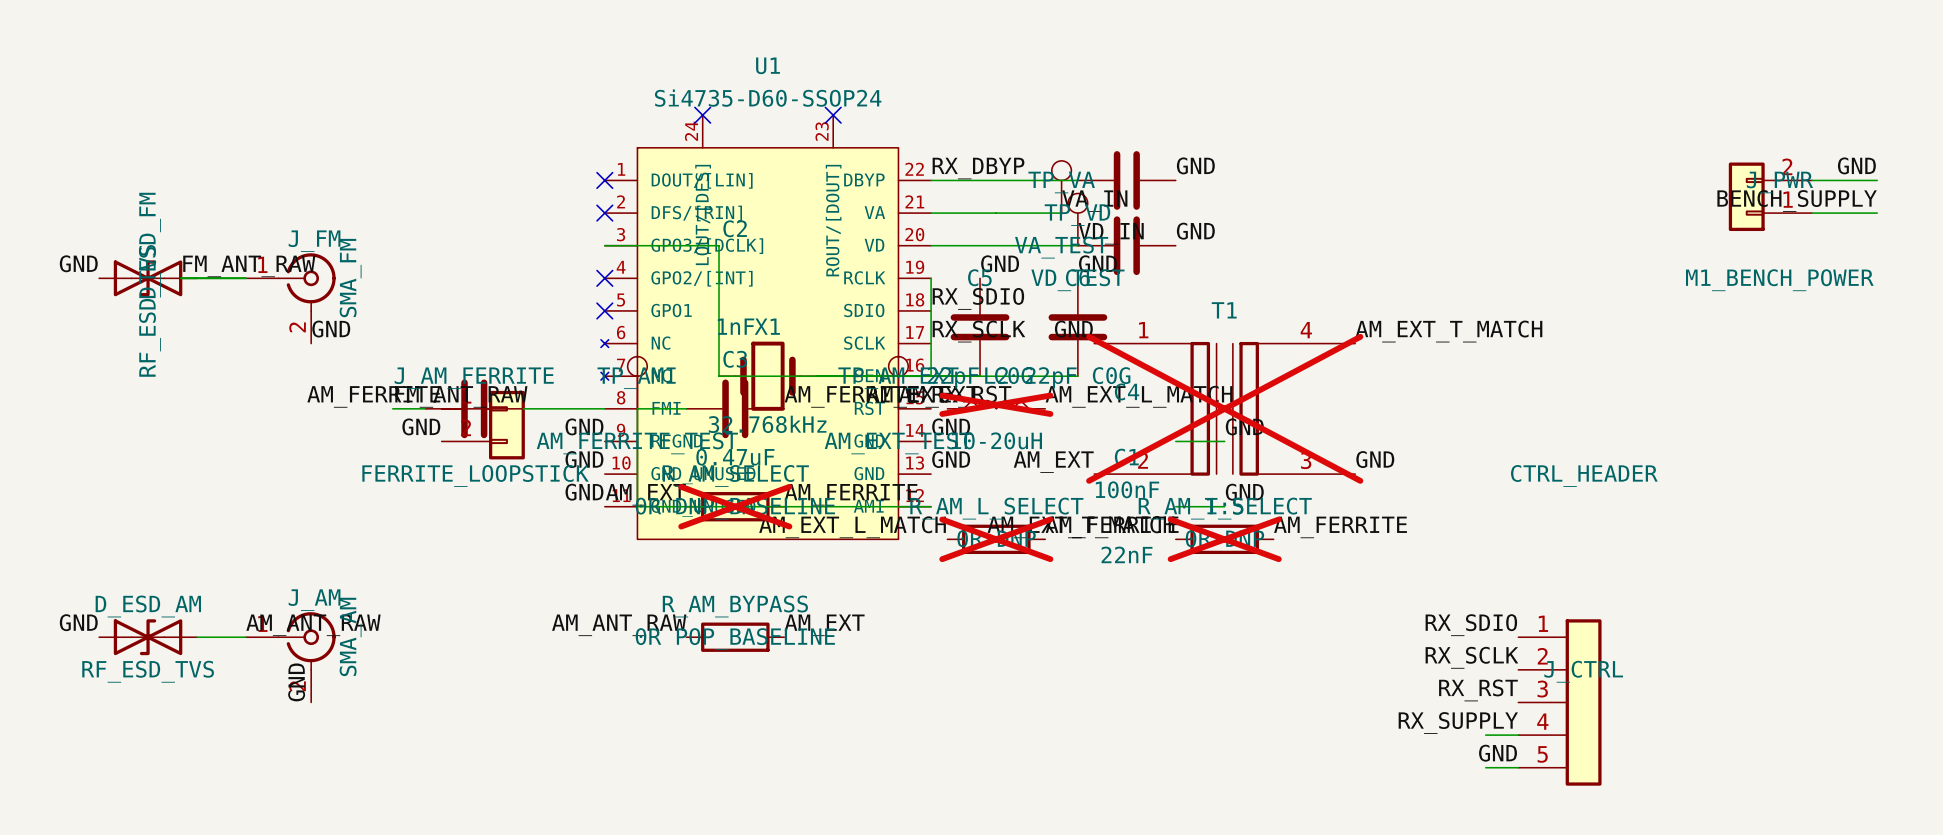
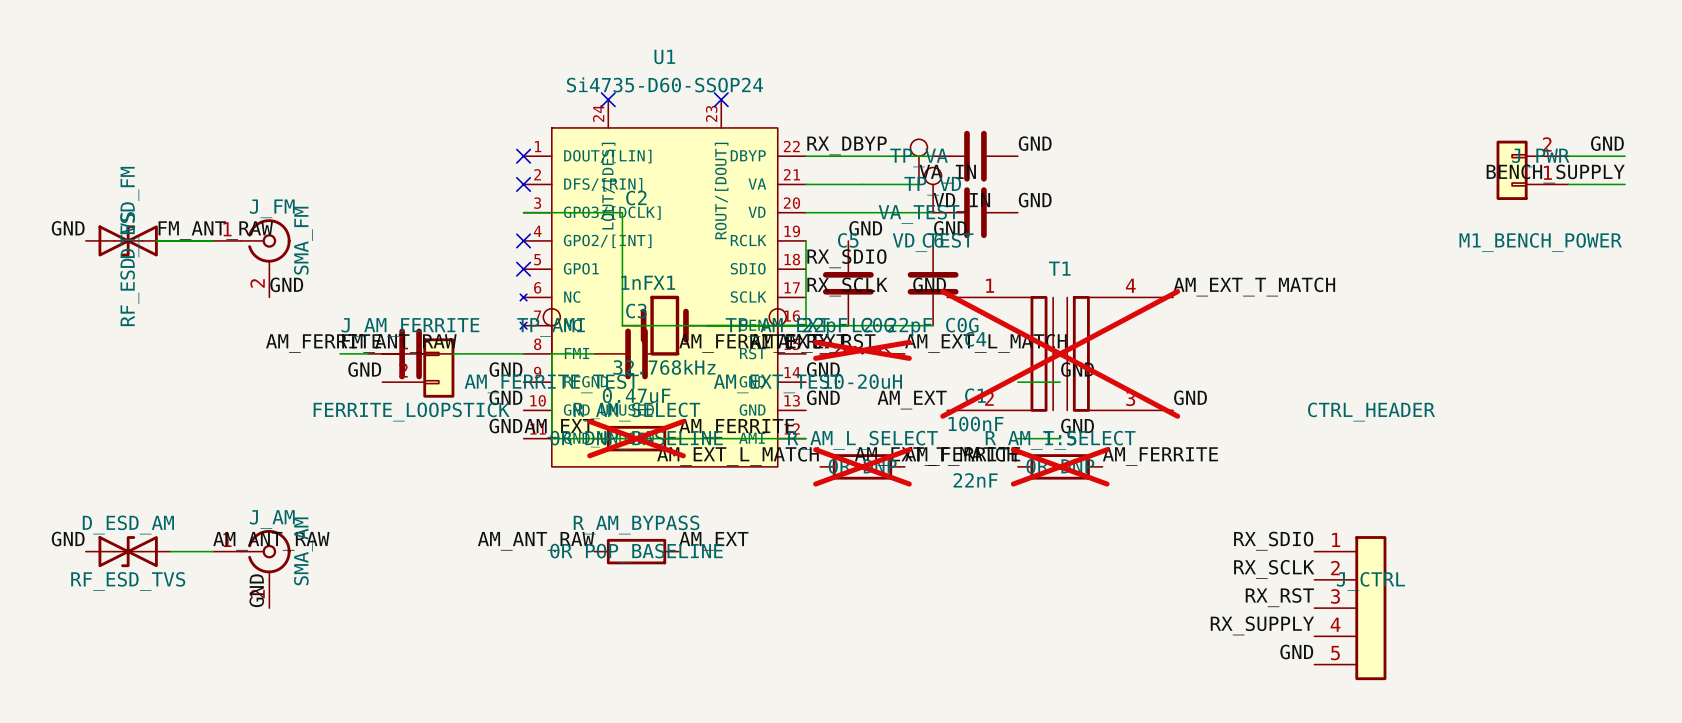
wire: (1485, 735) (1518, 735) -> none
wire: (1485, 767) (1518, 767) -> none

